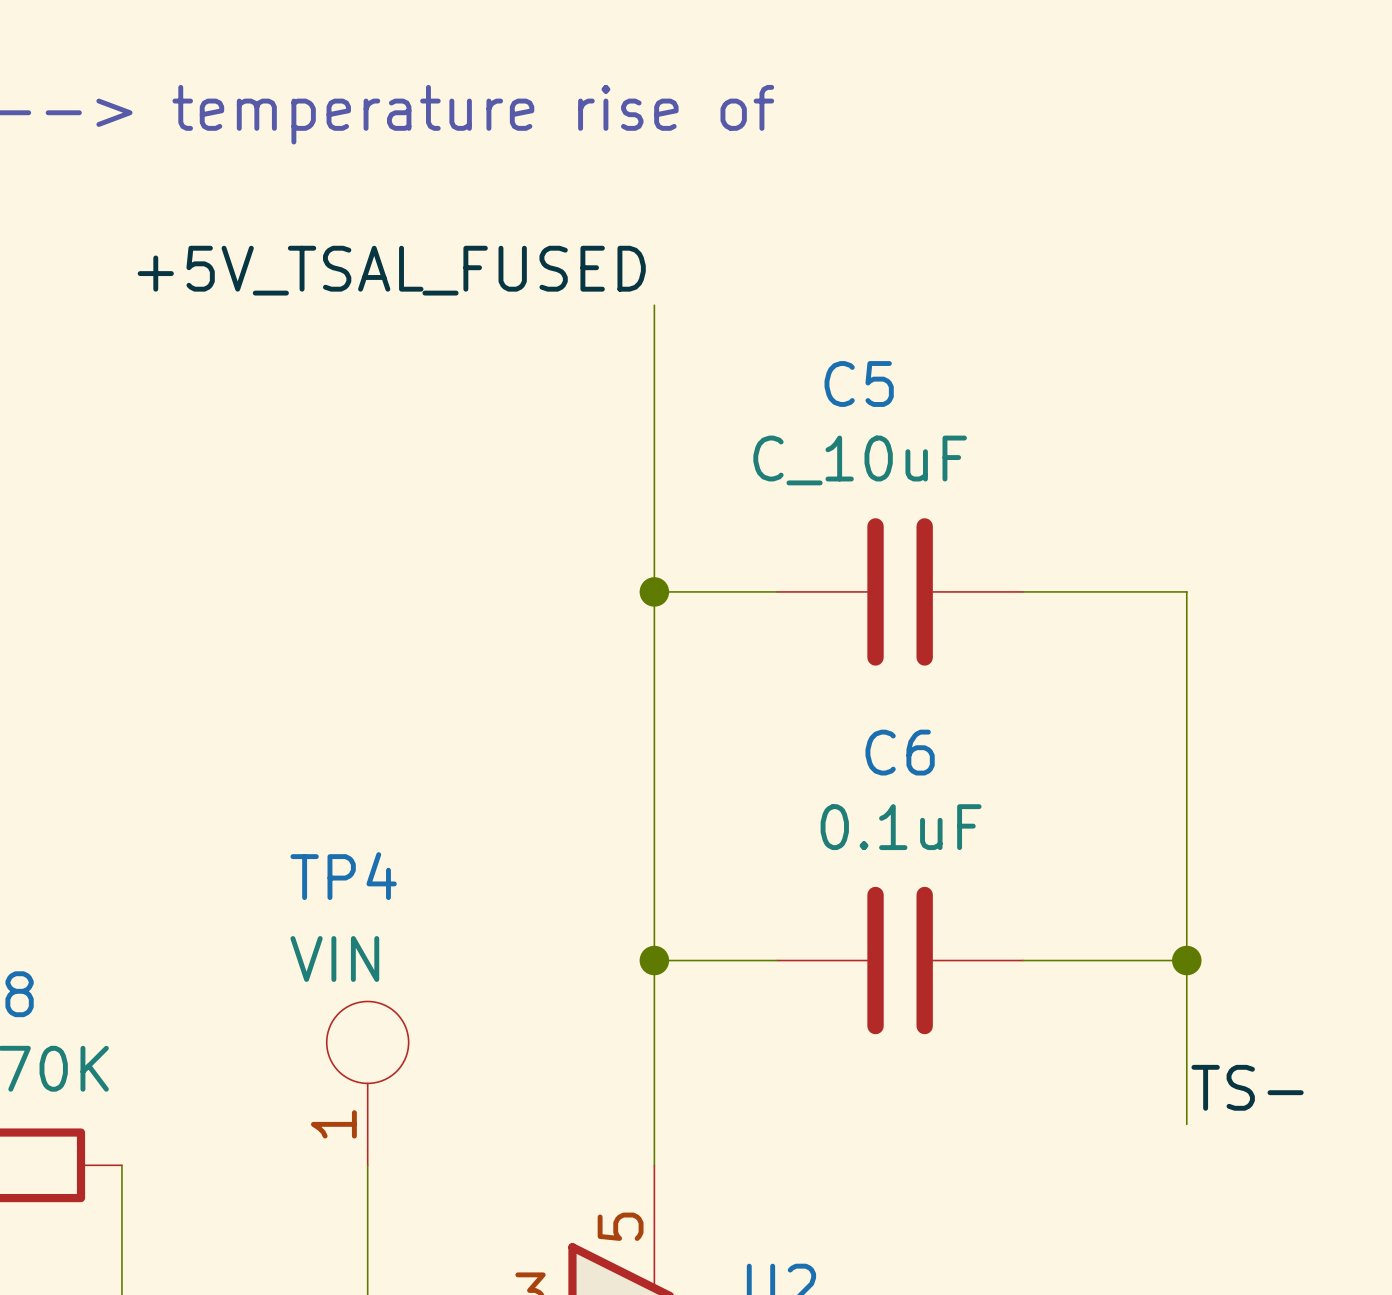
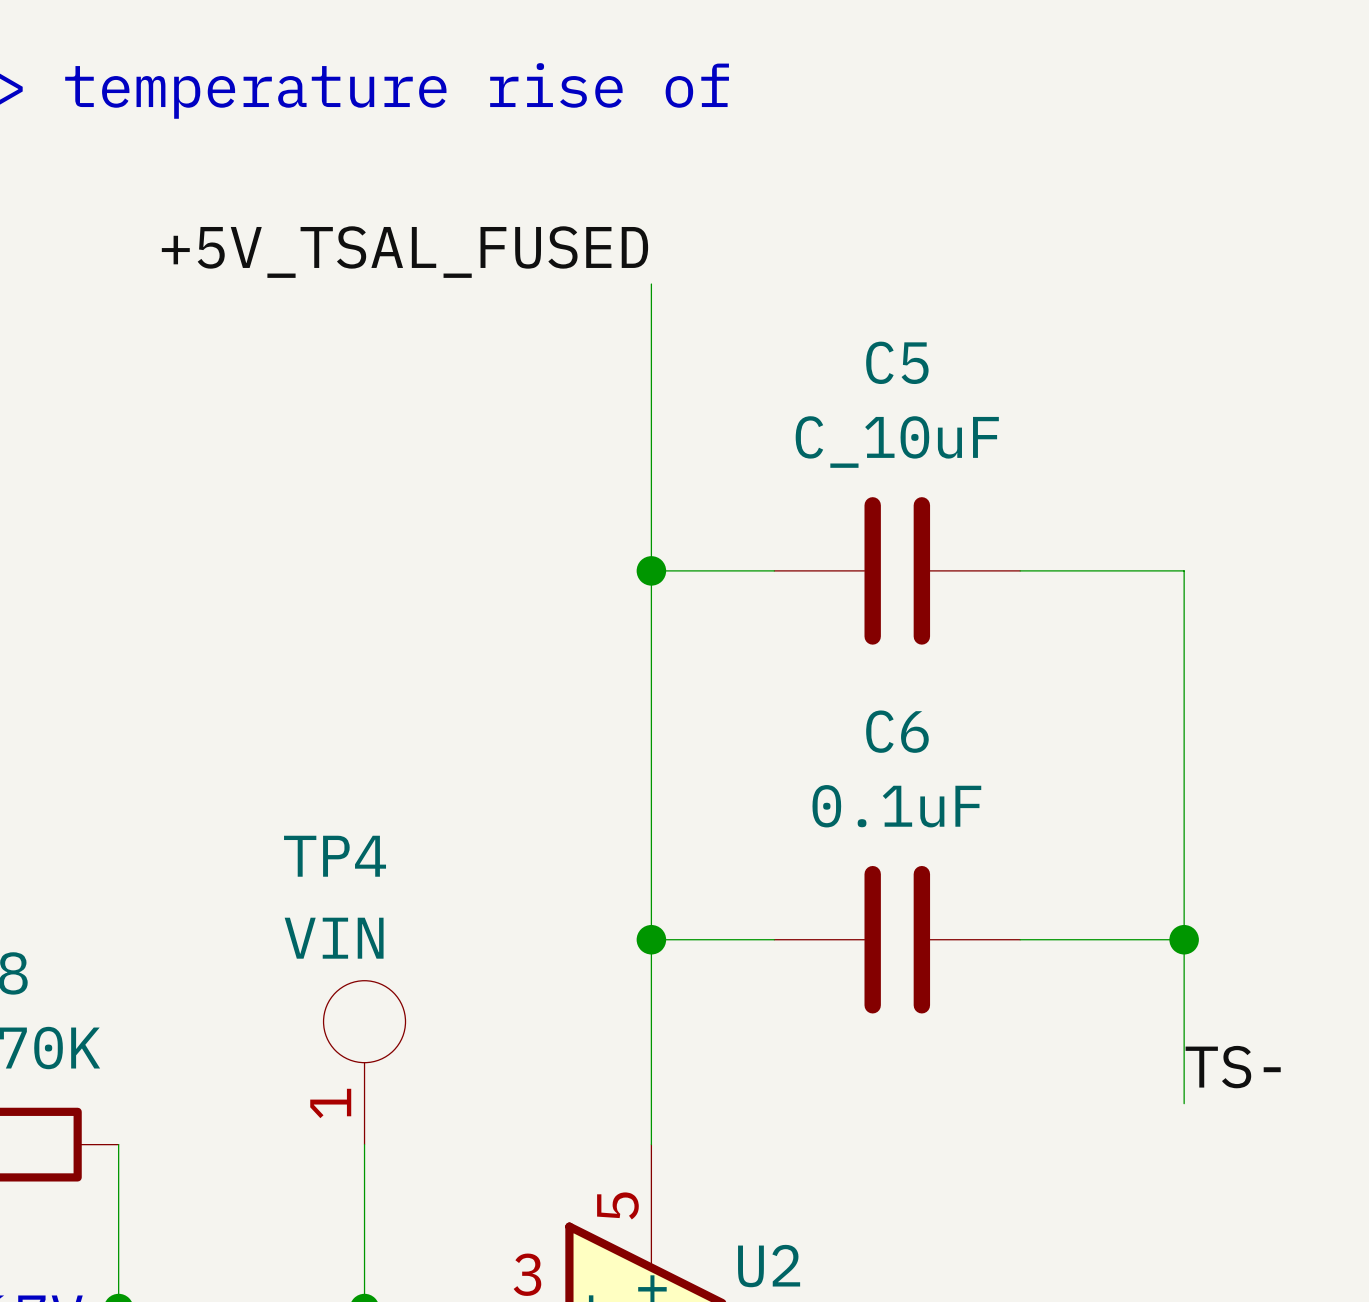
C5 name position: C5 (859, 383) -> C5 (897, 362)
C5 value position: C_10uF (860, 460) -> C_10uF (897, 442)

